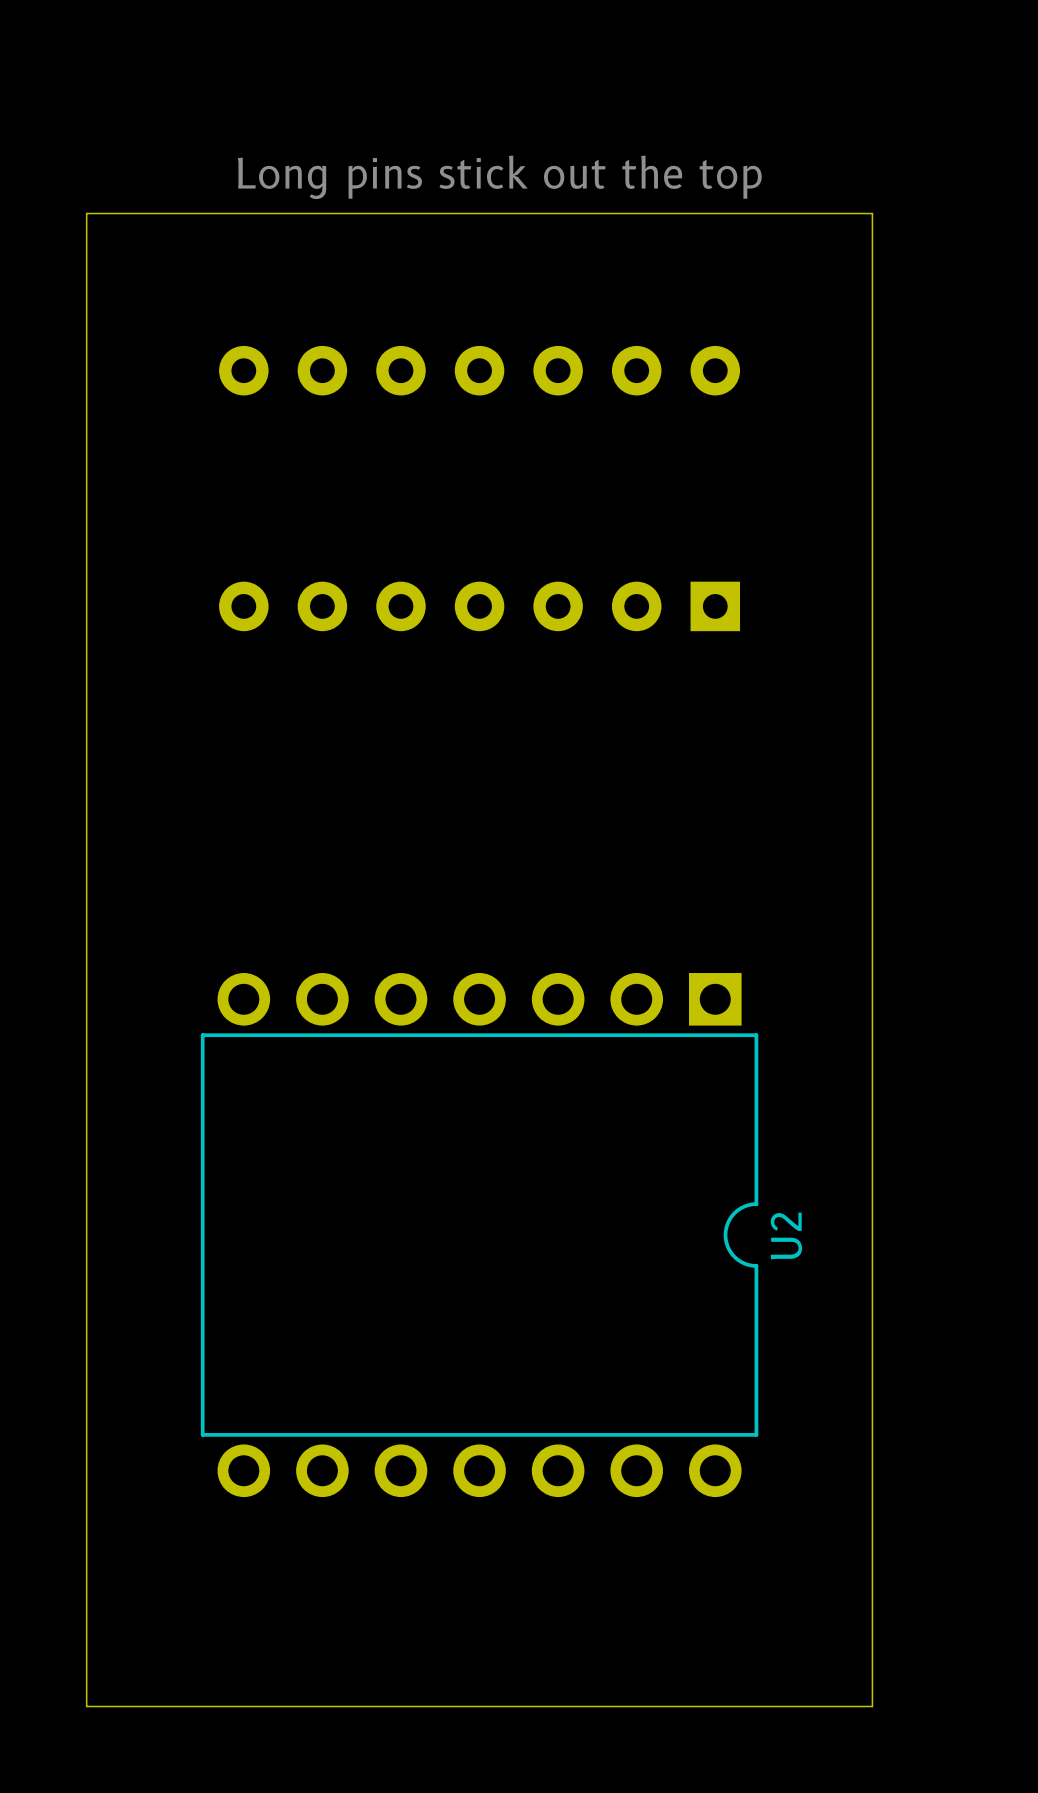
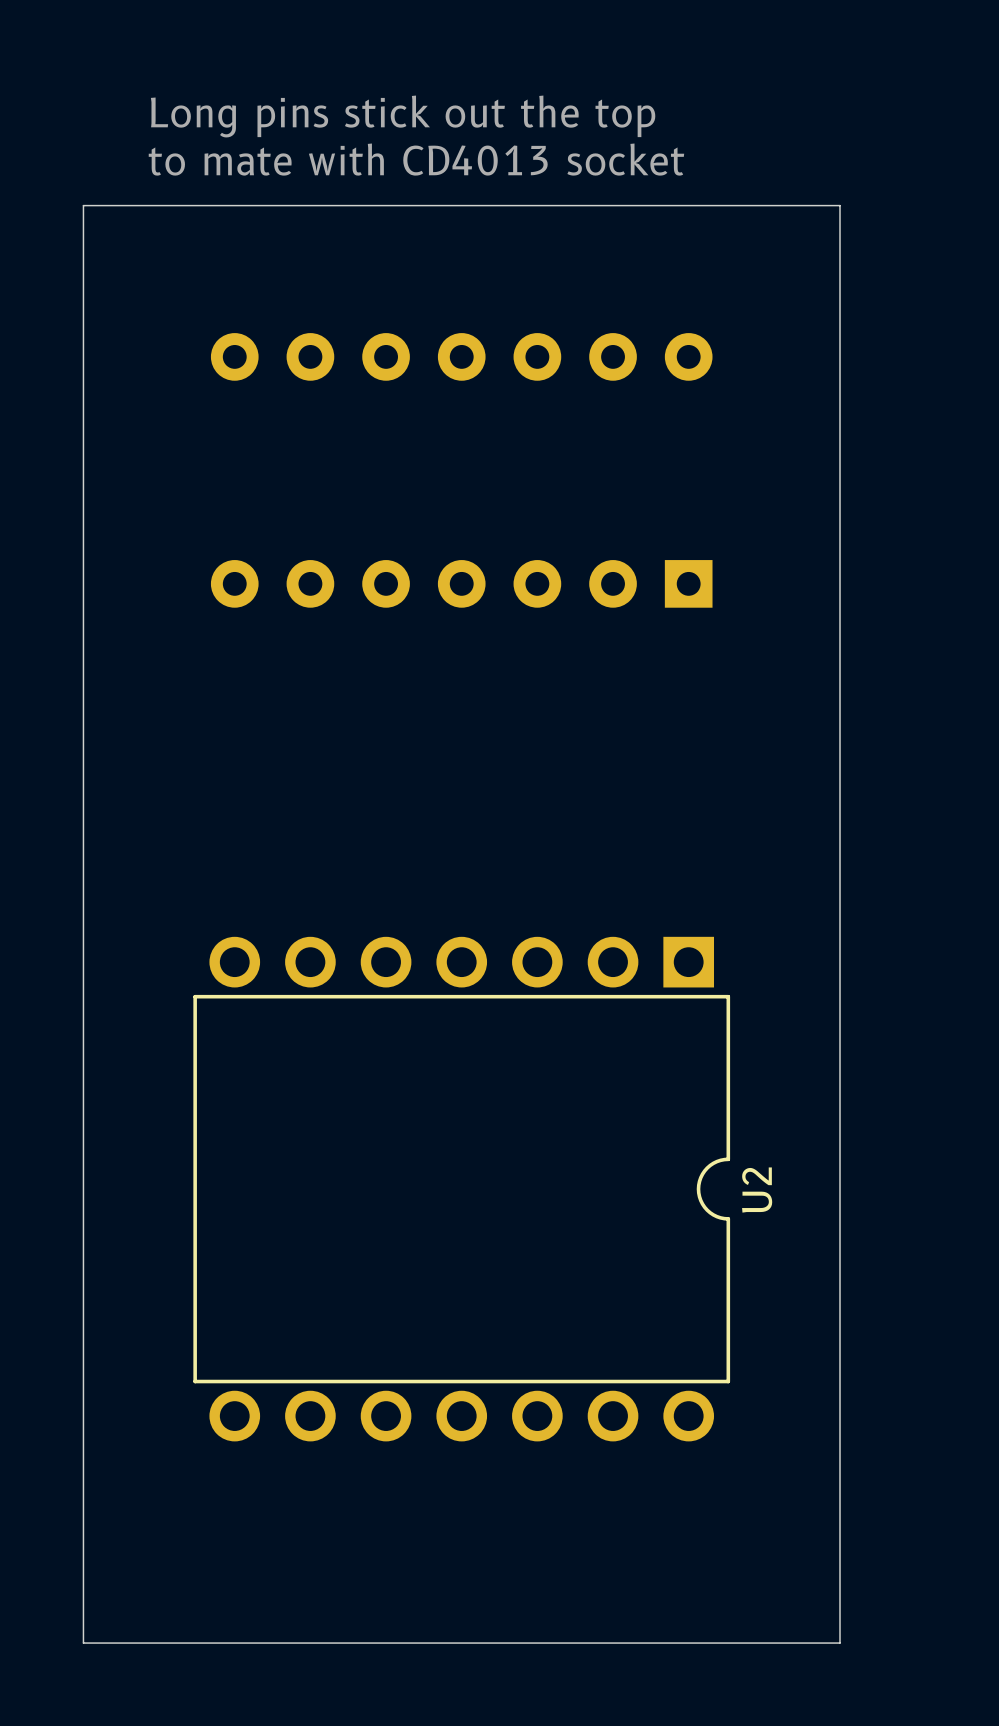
text: none -> to mate with CD4013 socket (416, 159)
text position: Long pins stick out the top (499, 177) -> Long pins stick out the top (403, 116)

